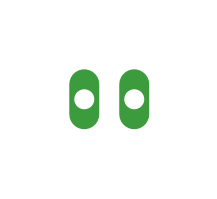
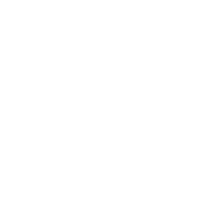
part: (109, 99) -> none

